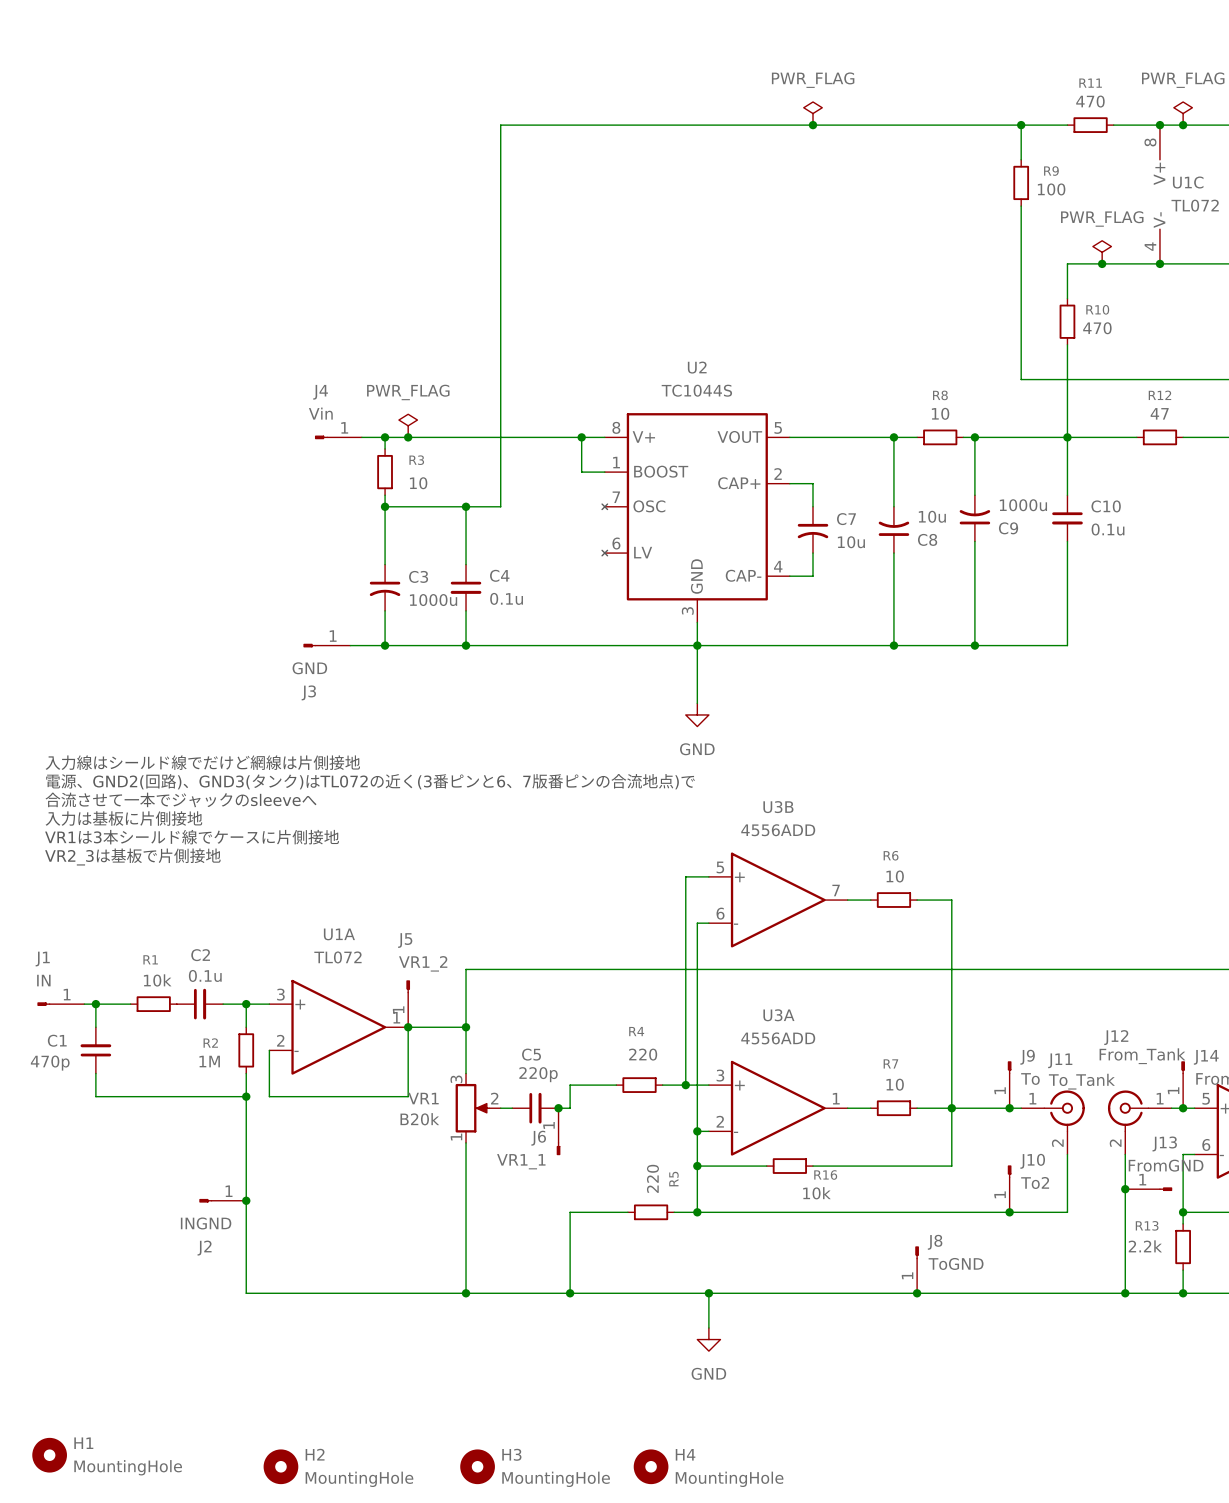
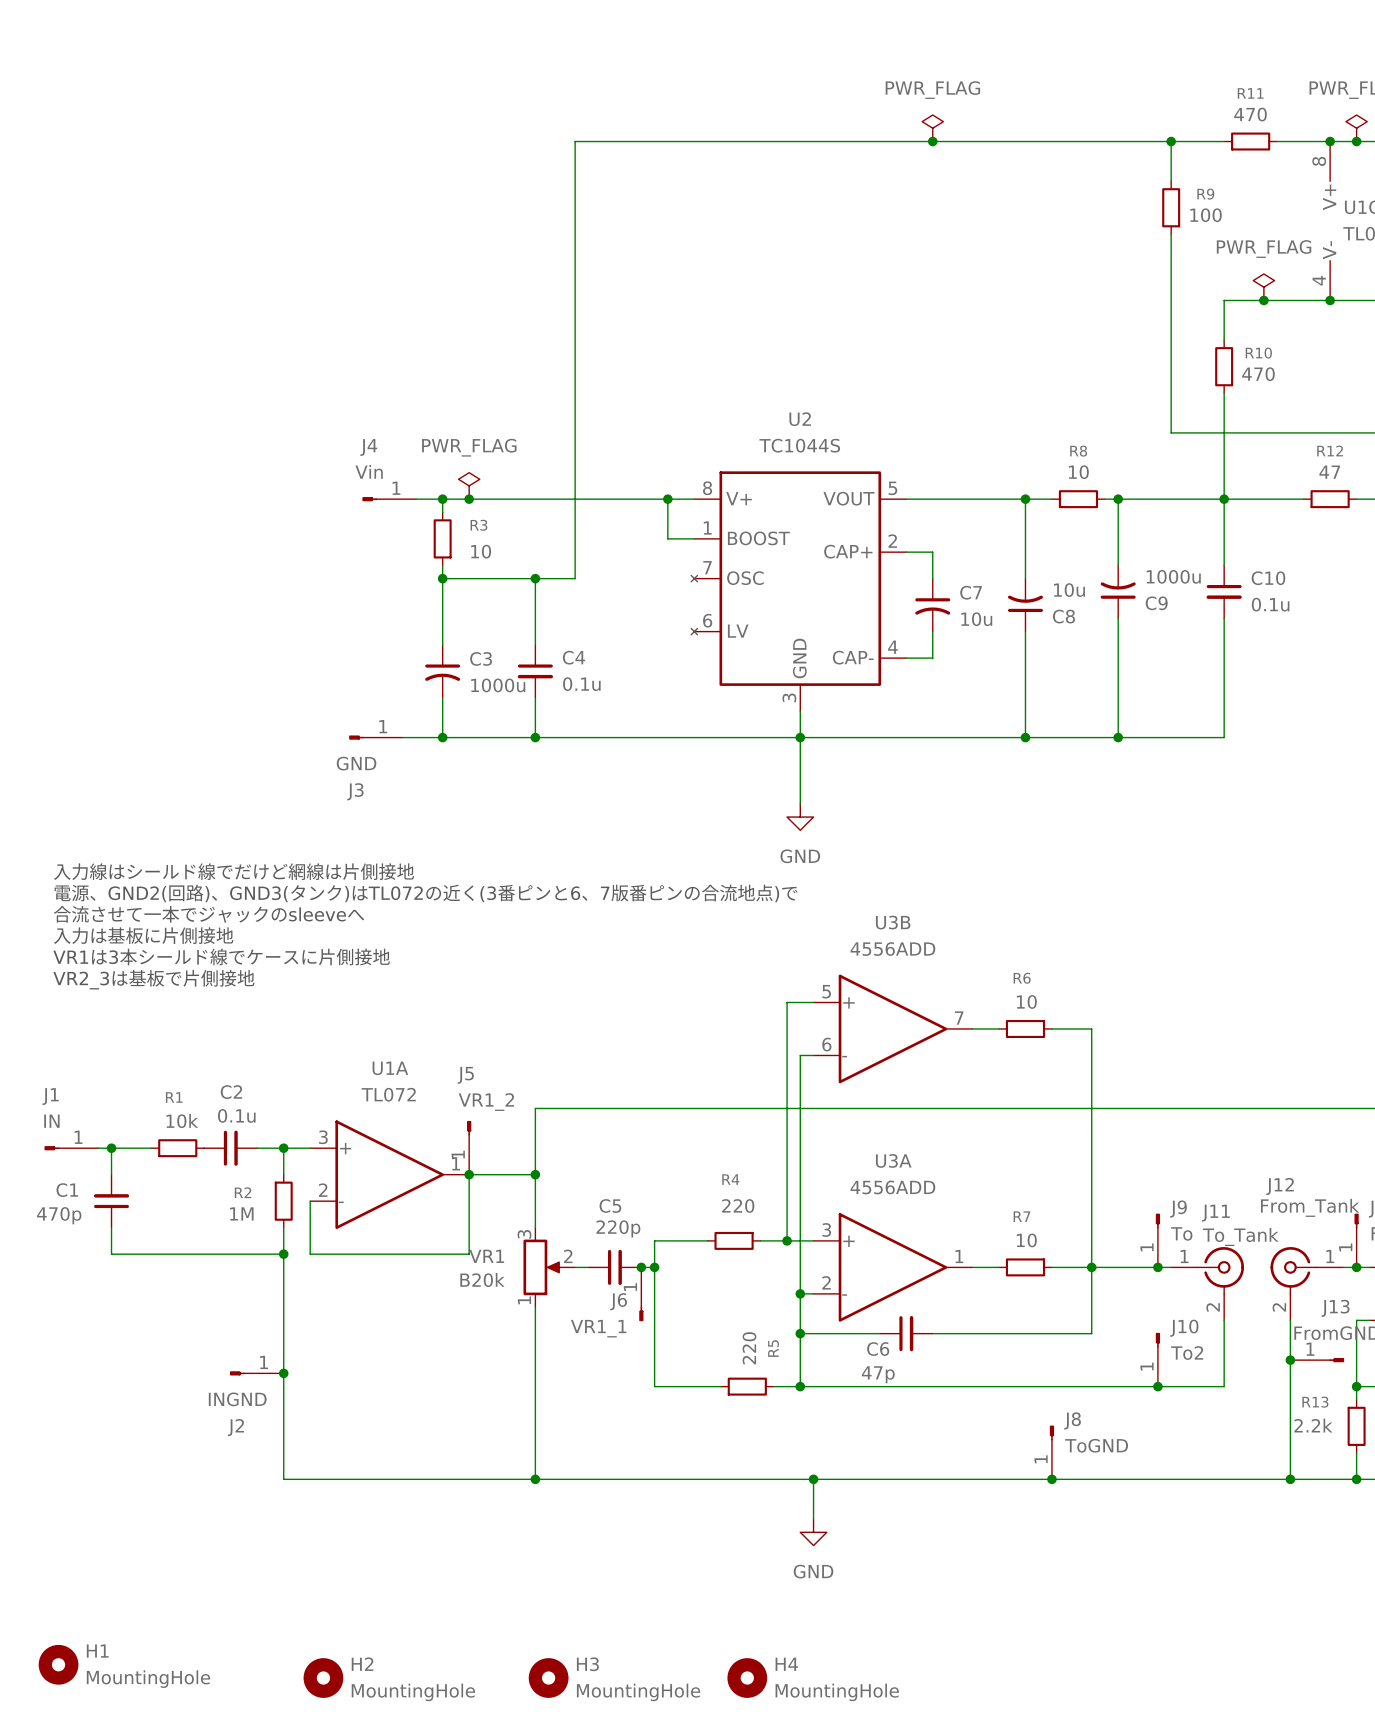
junction: none -> (654, 1267)
R16: 10k (789, 1166) -> none
C6: none -> 47p (906, 1333)
wire: (570, 1212) (570, 1293) -> (654, 1386) (654, 1267)
junction: (570, 1293) -> none

